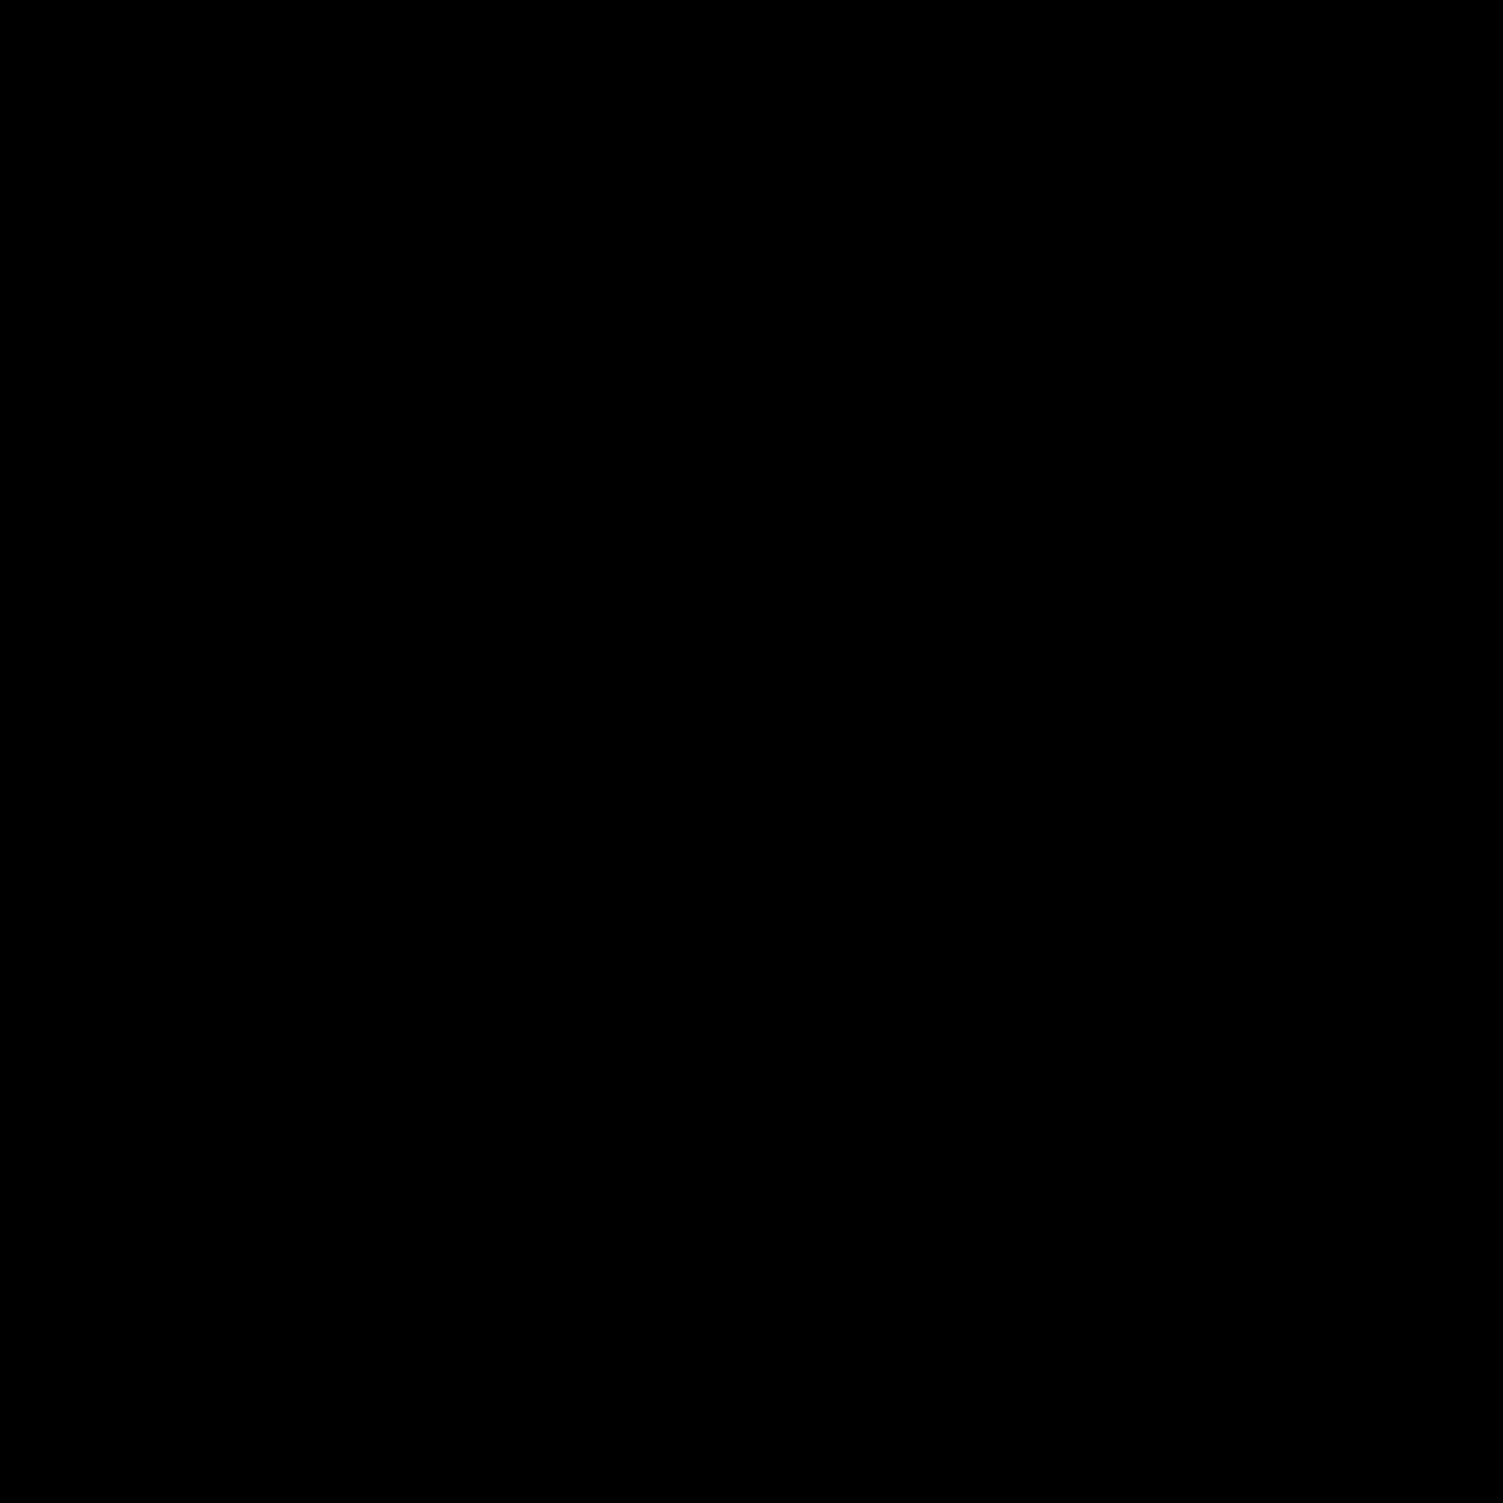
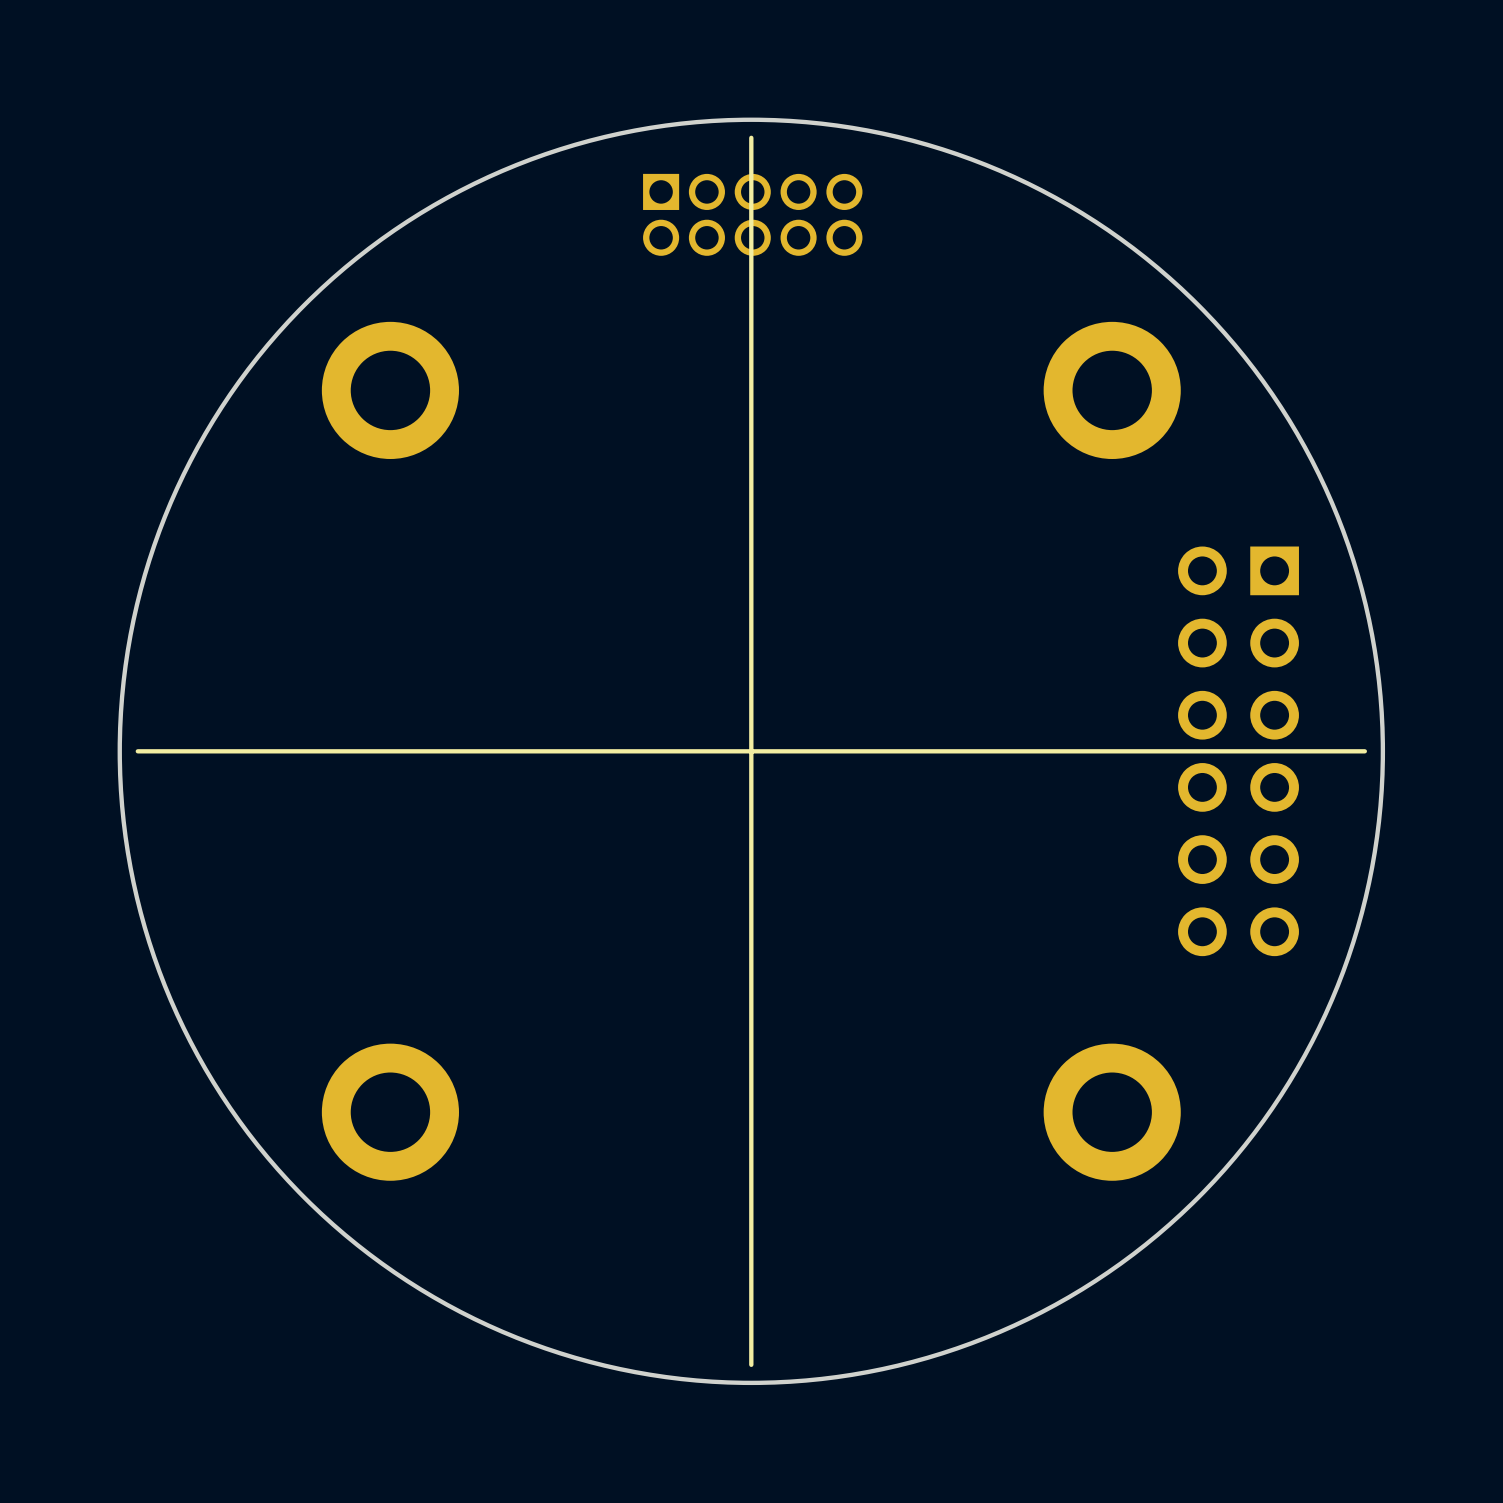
round board edge: none -> [117, 117, 1386, 1386]
line: none -> (751, 137) (751, 1364)
part: none -> (752, 214)
part: none -> (390, 390)
part: none -> (1112, 390)
part: none -> (1238, 751)
line: none -> (1364, 751) (137, 751)
part: none -> (390, 1112)
part: none -> (1112, 1112)

